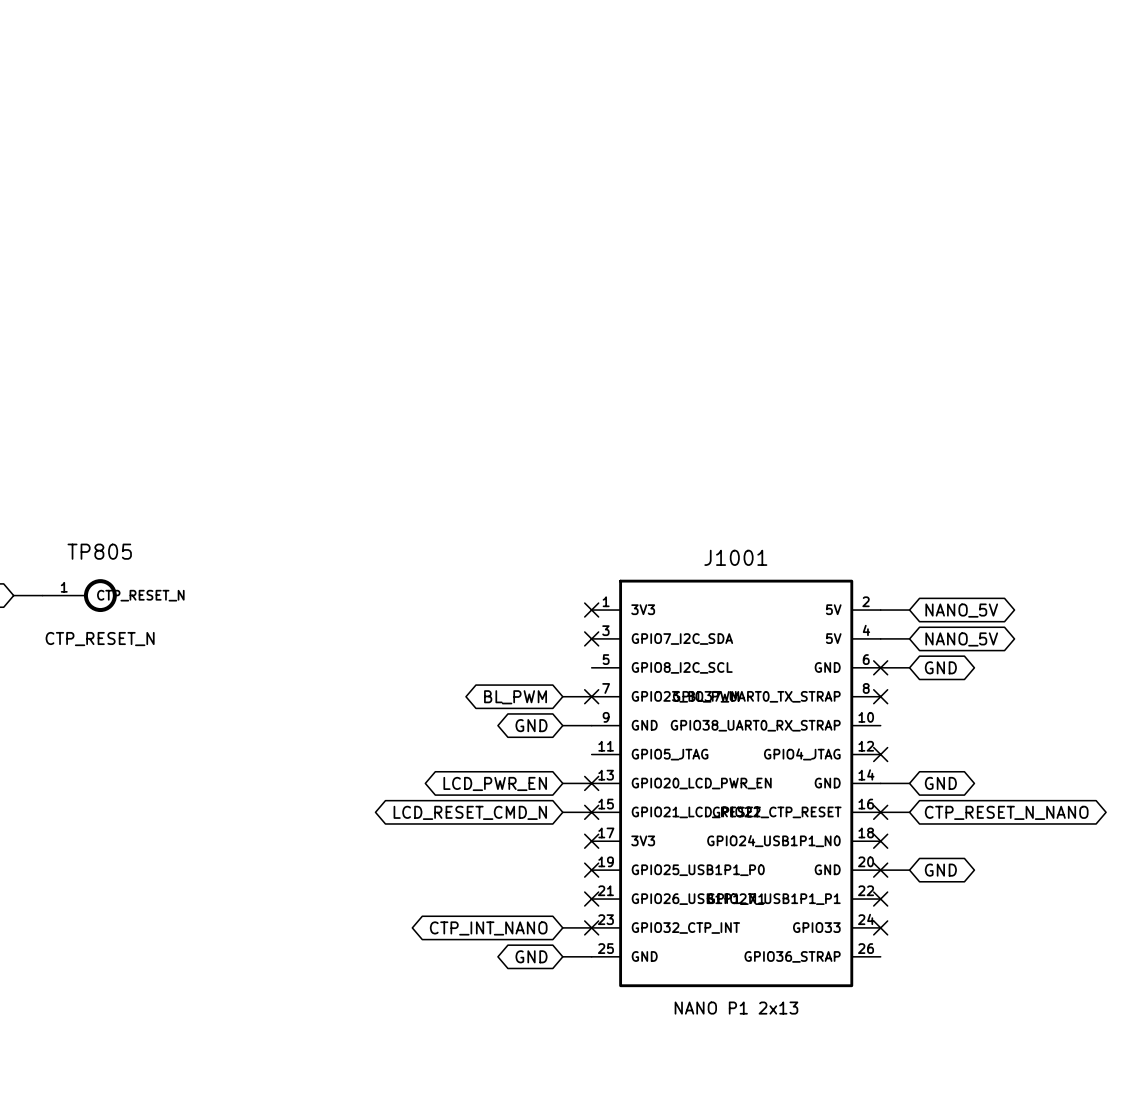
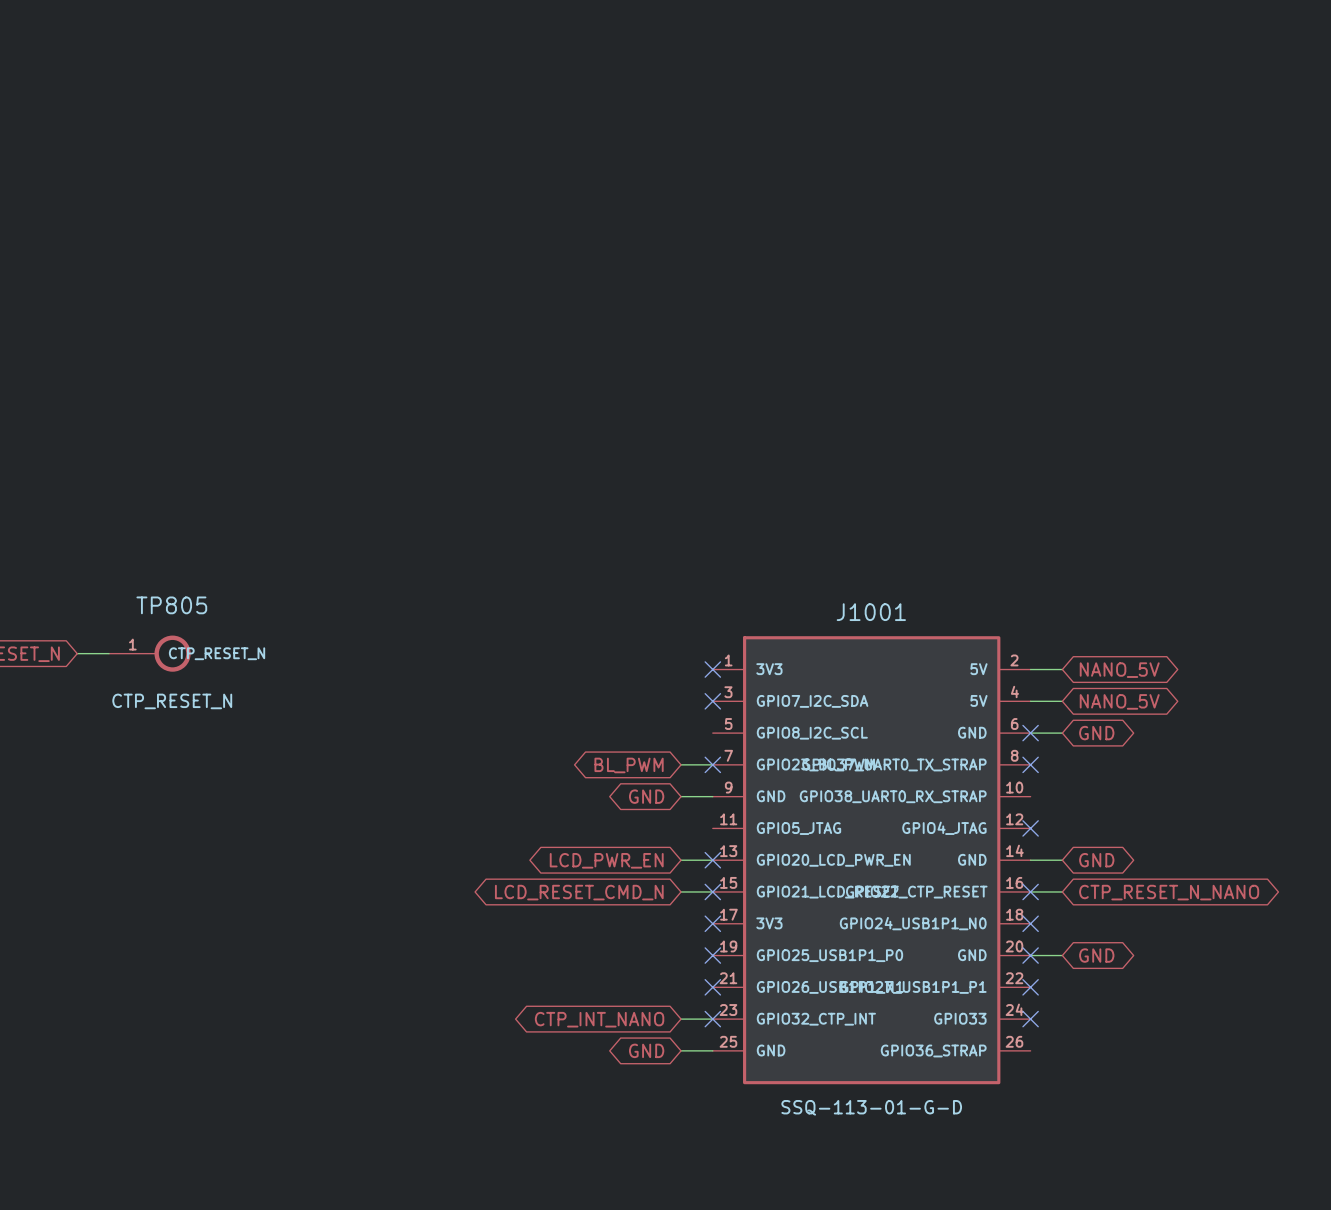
J1001 value: NANO P1 2x13 (736, 1008) -> SSQ-113-01-G-D (871, 1107)

